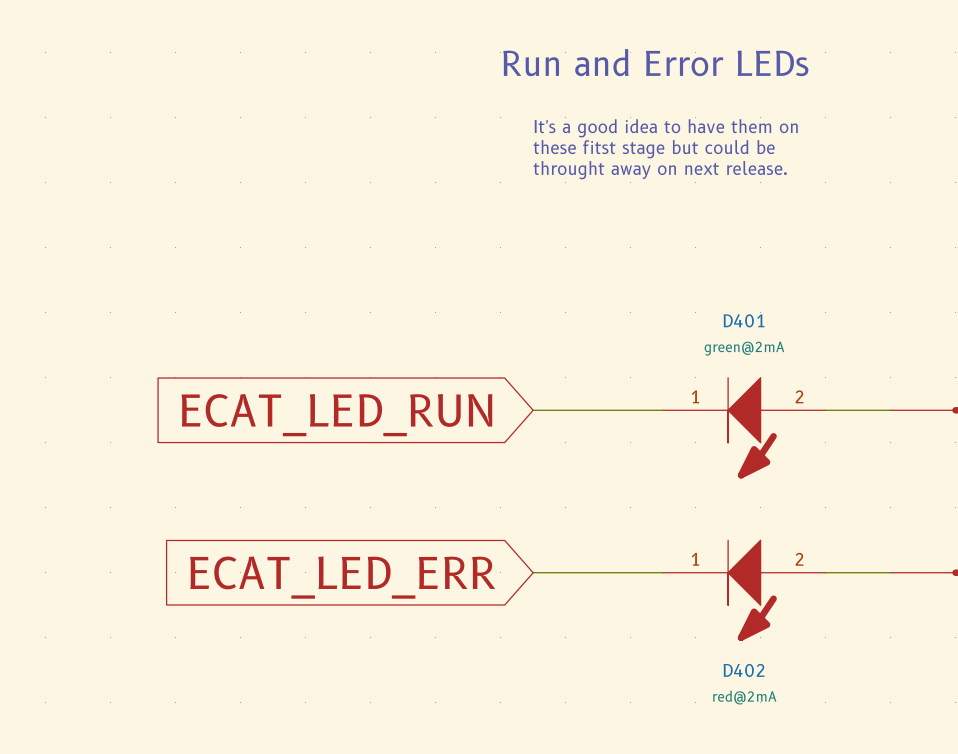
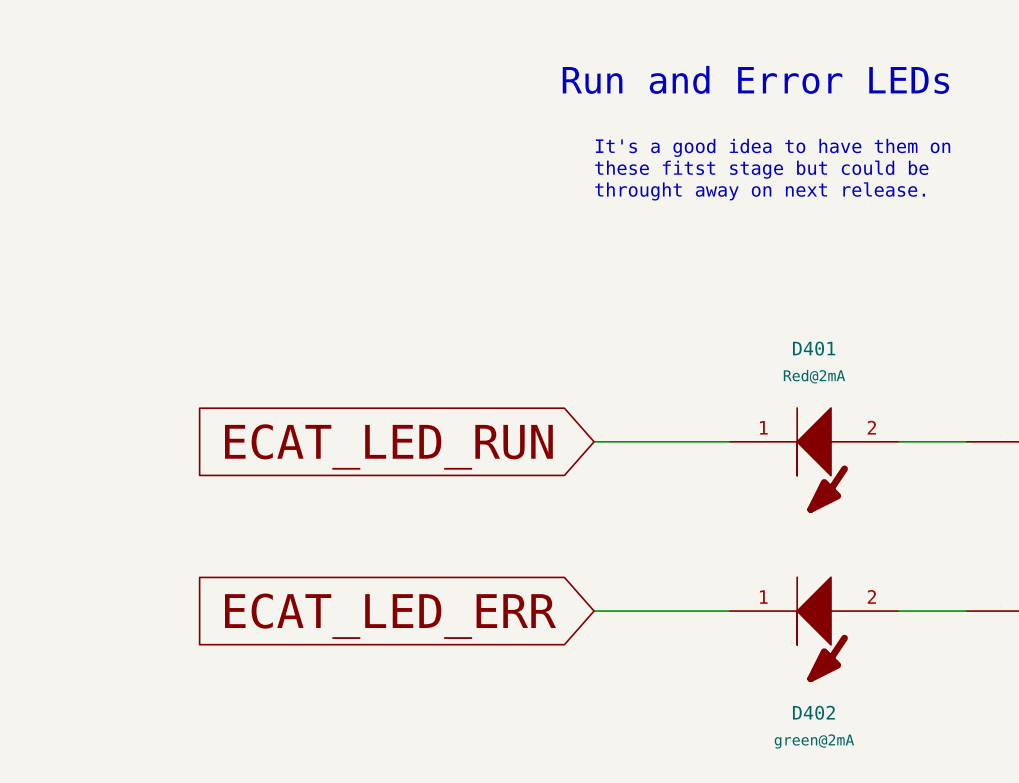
D401 value: green@2mA (744, 348) -> Red@2mA (814, 376)
D402 value: red@2mA (744, 697) -> green@2mA (814, 741)

